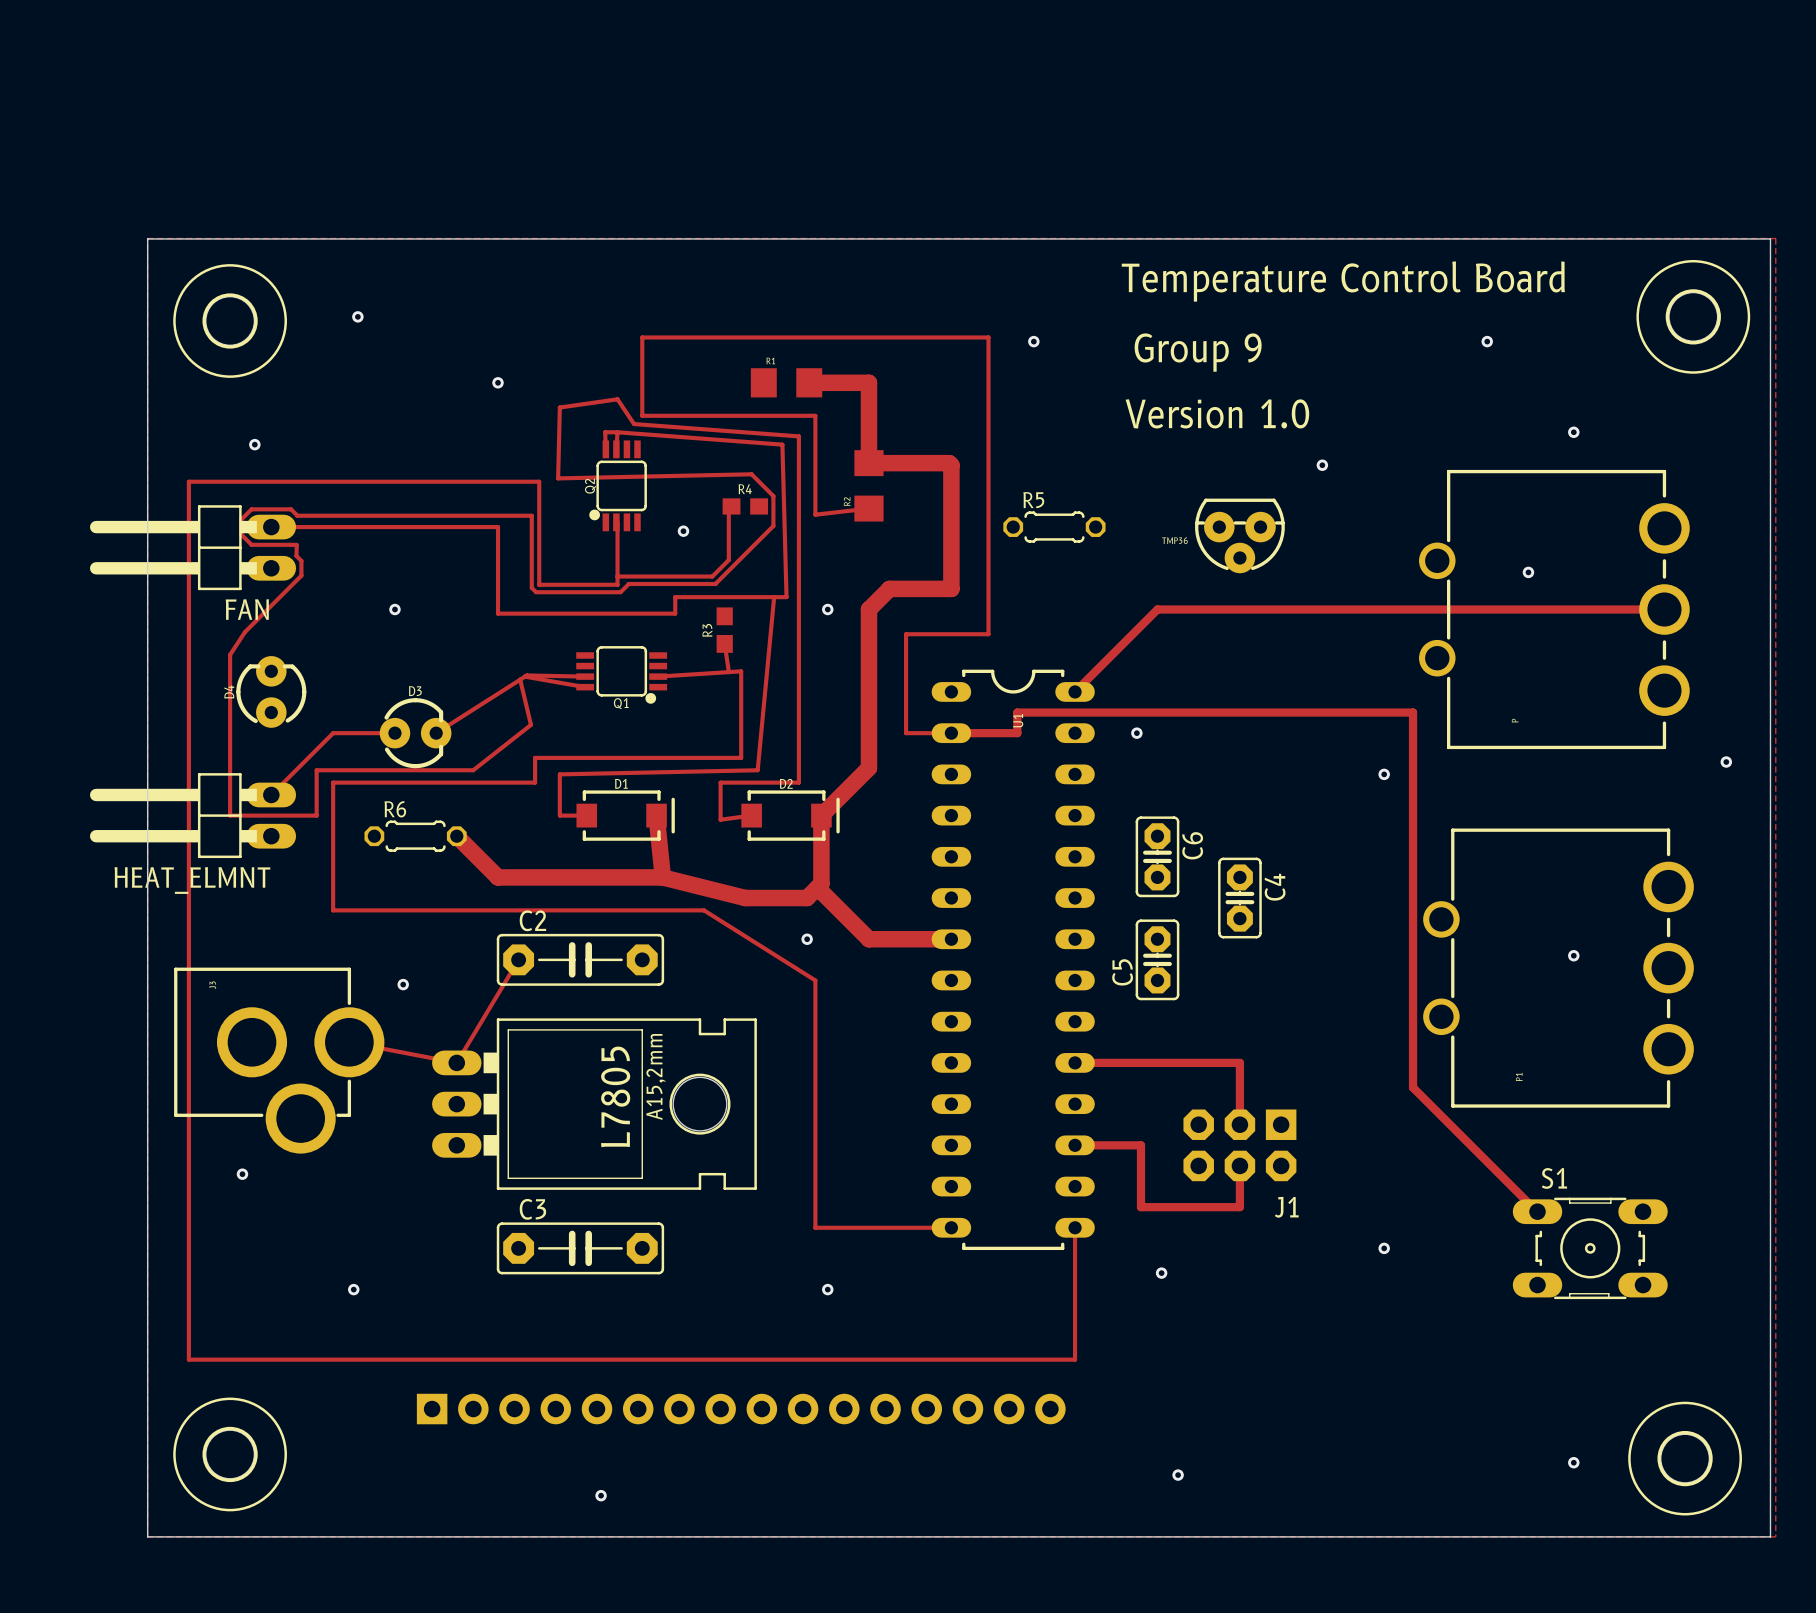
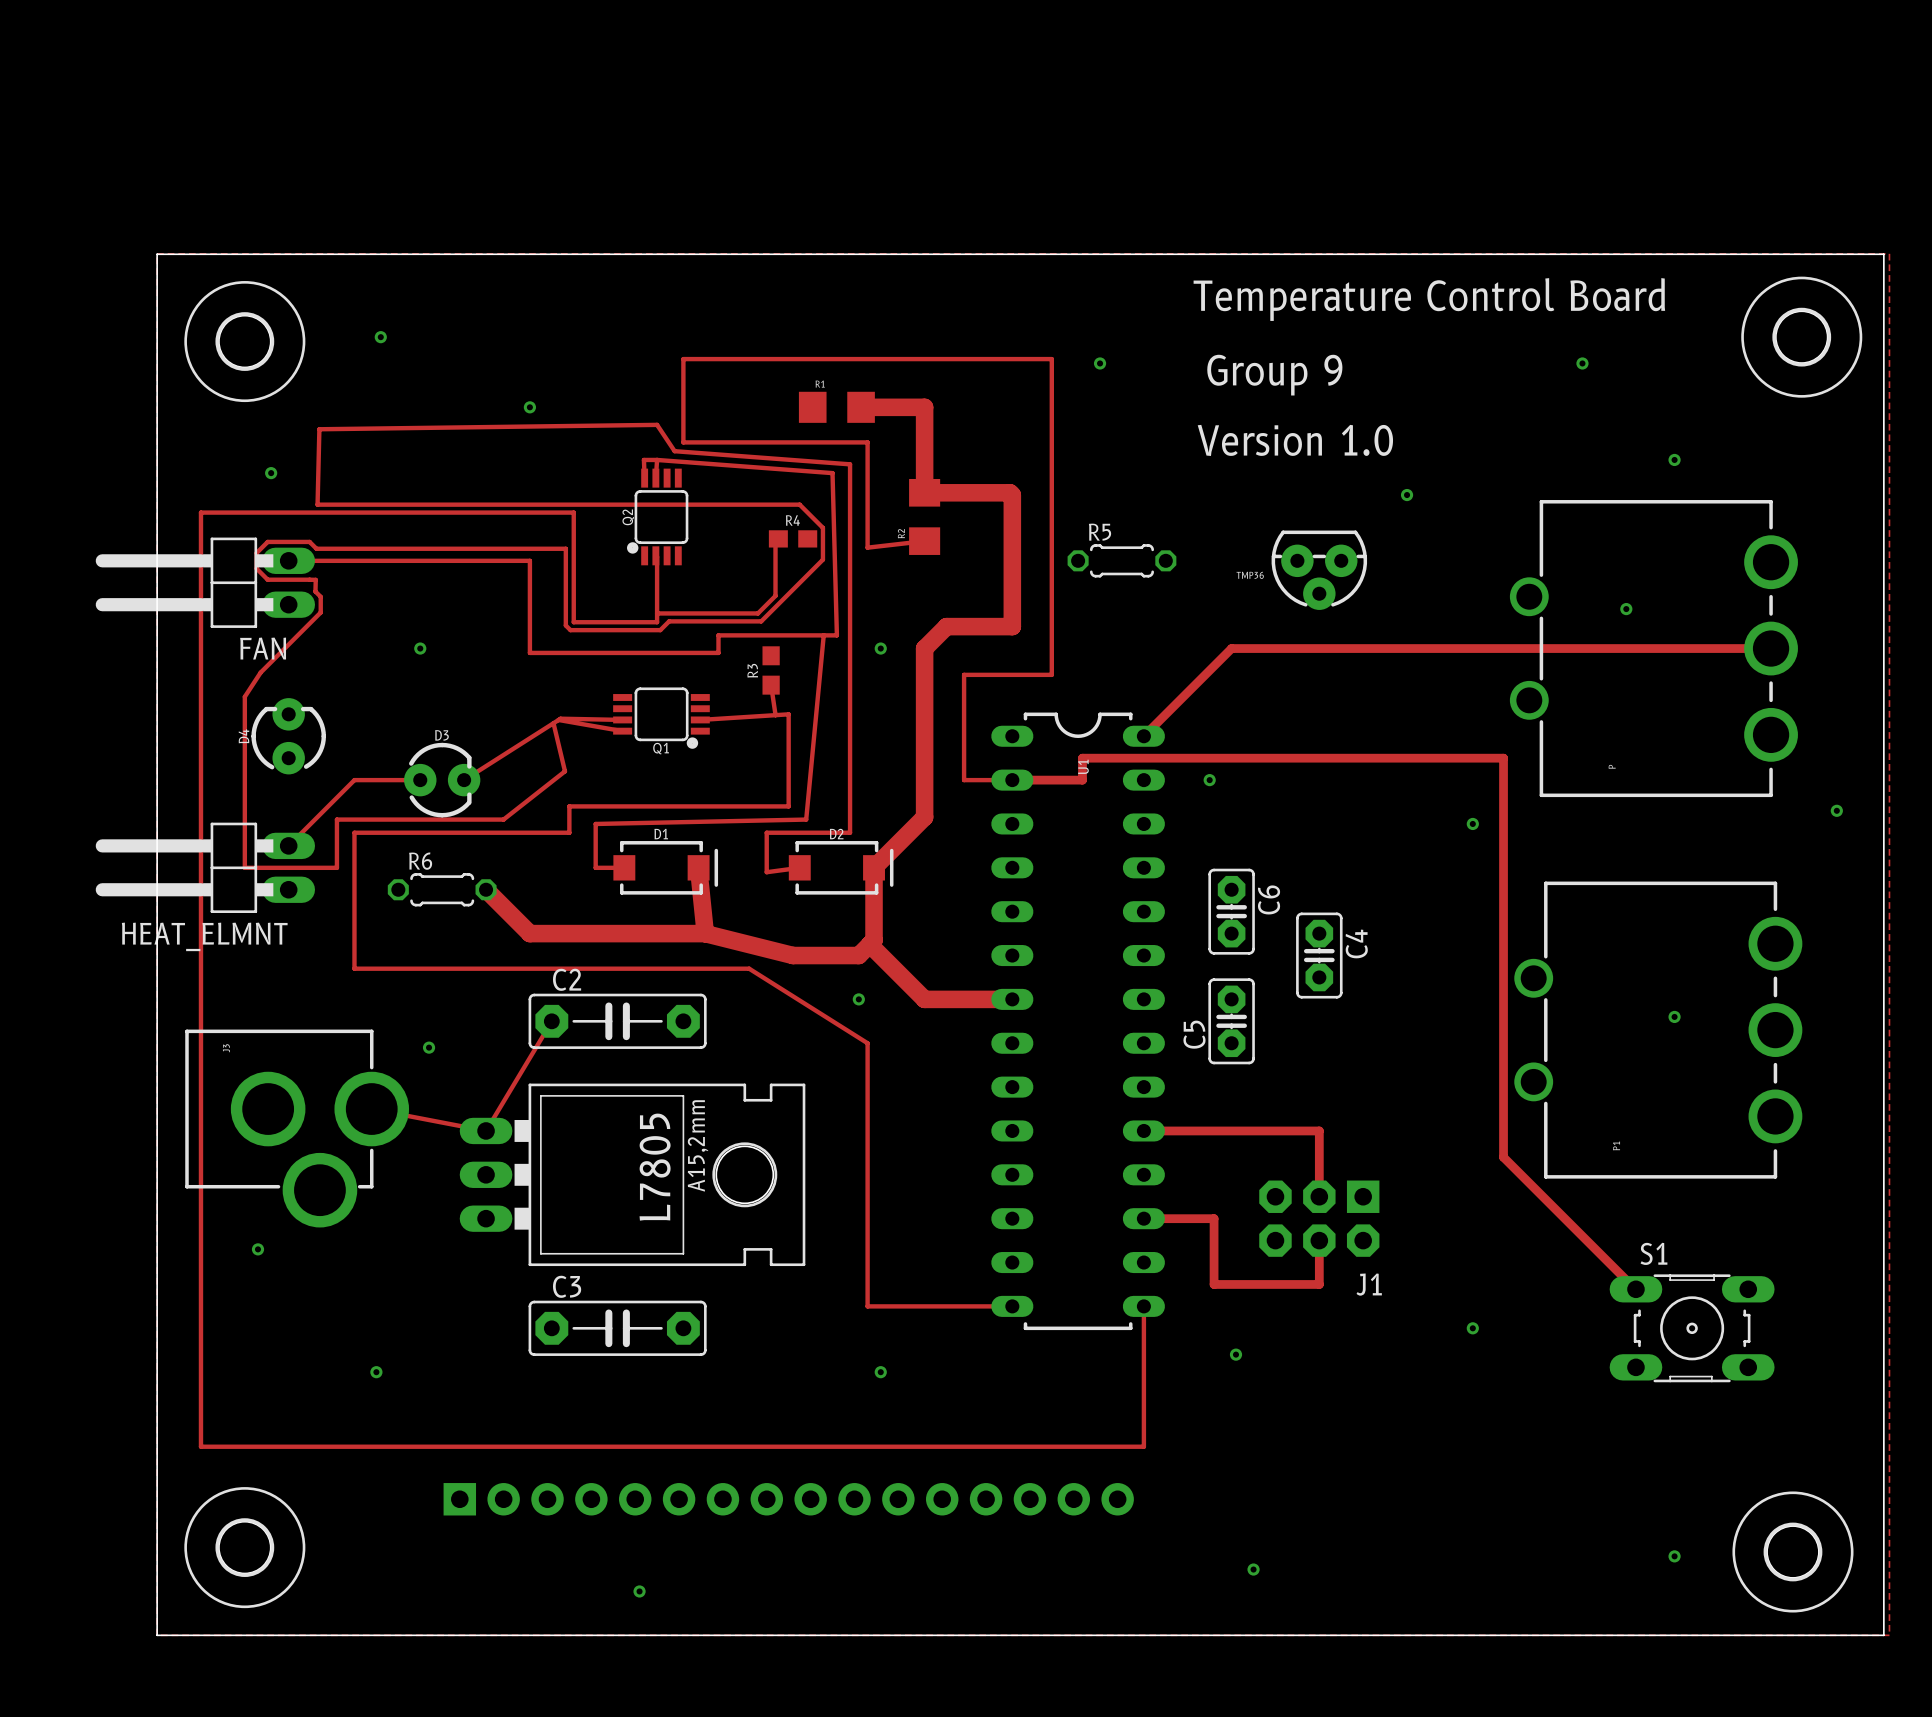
track: (617, 399) (559, 407) (558, 478) (751, 474) -> (657, 424) (319, 429) (317, 504) (799, 504)
via: (683, 531) -> none

